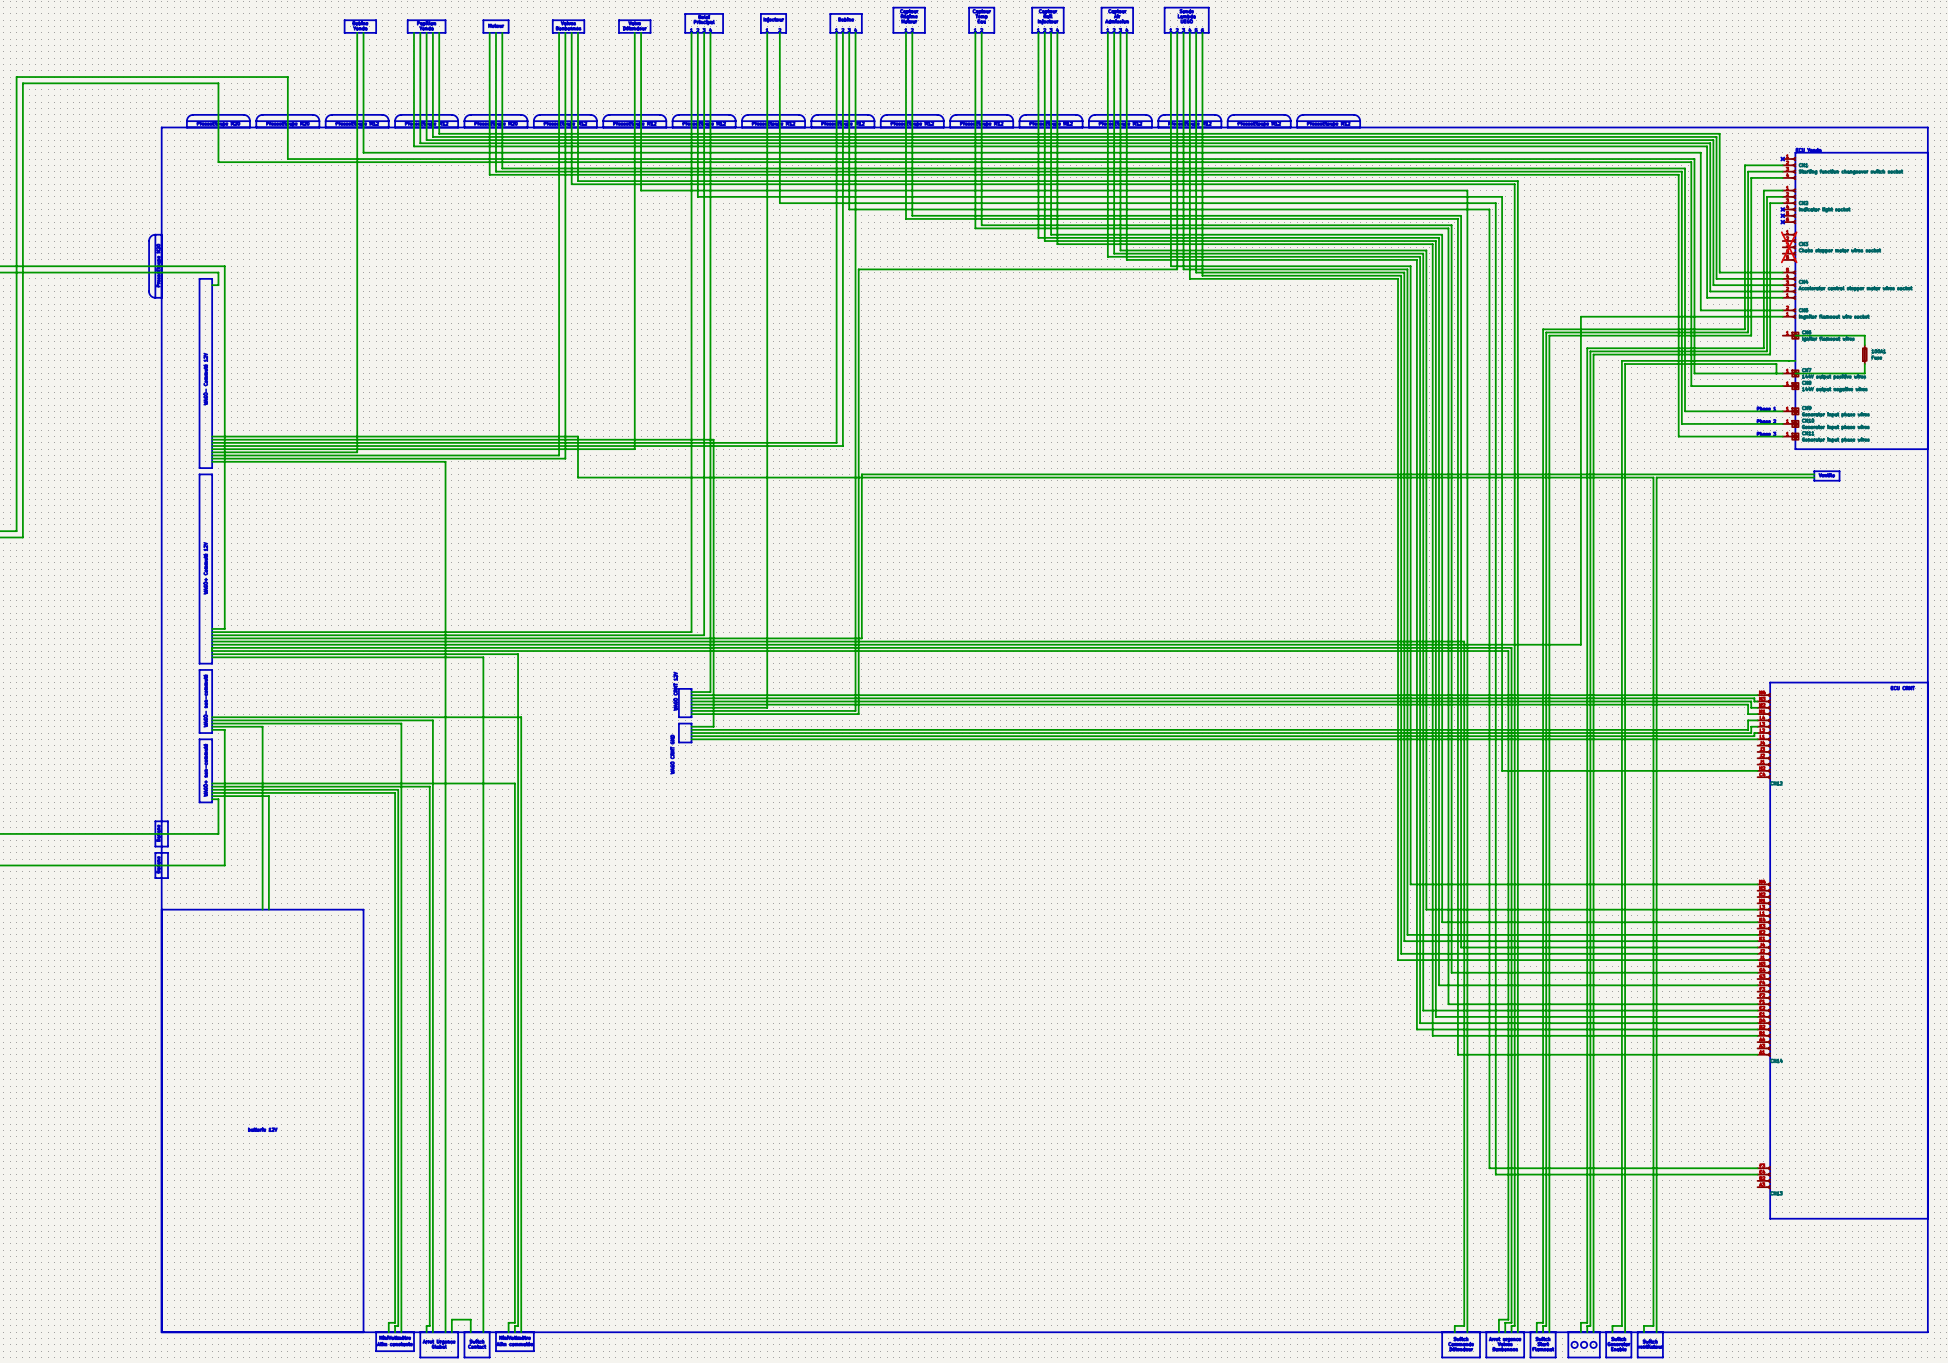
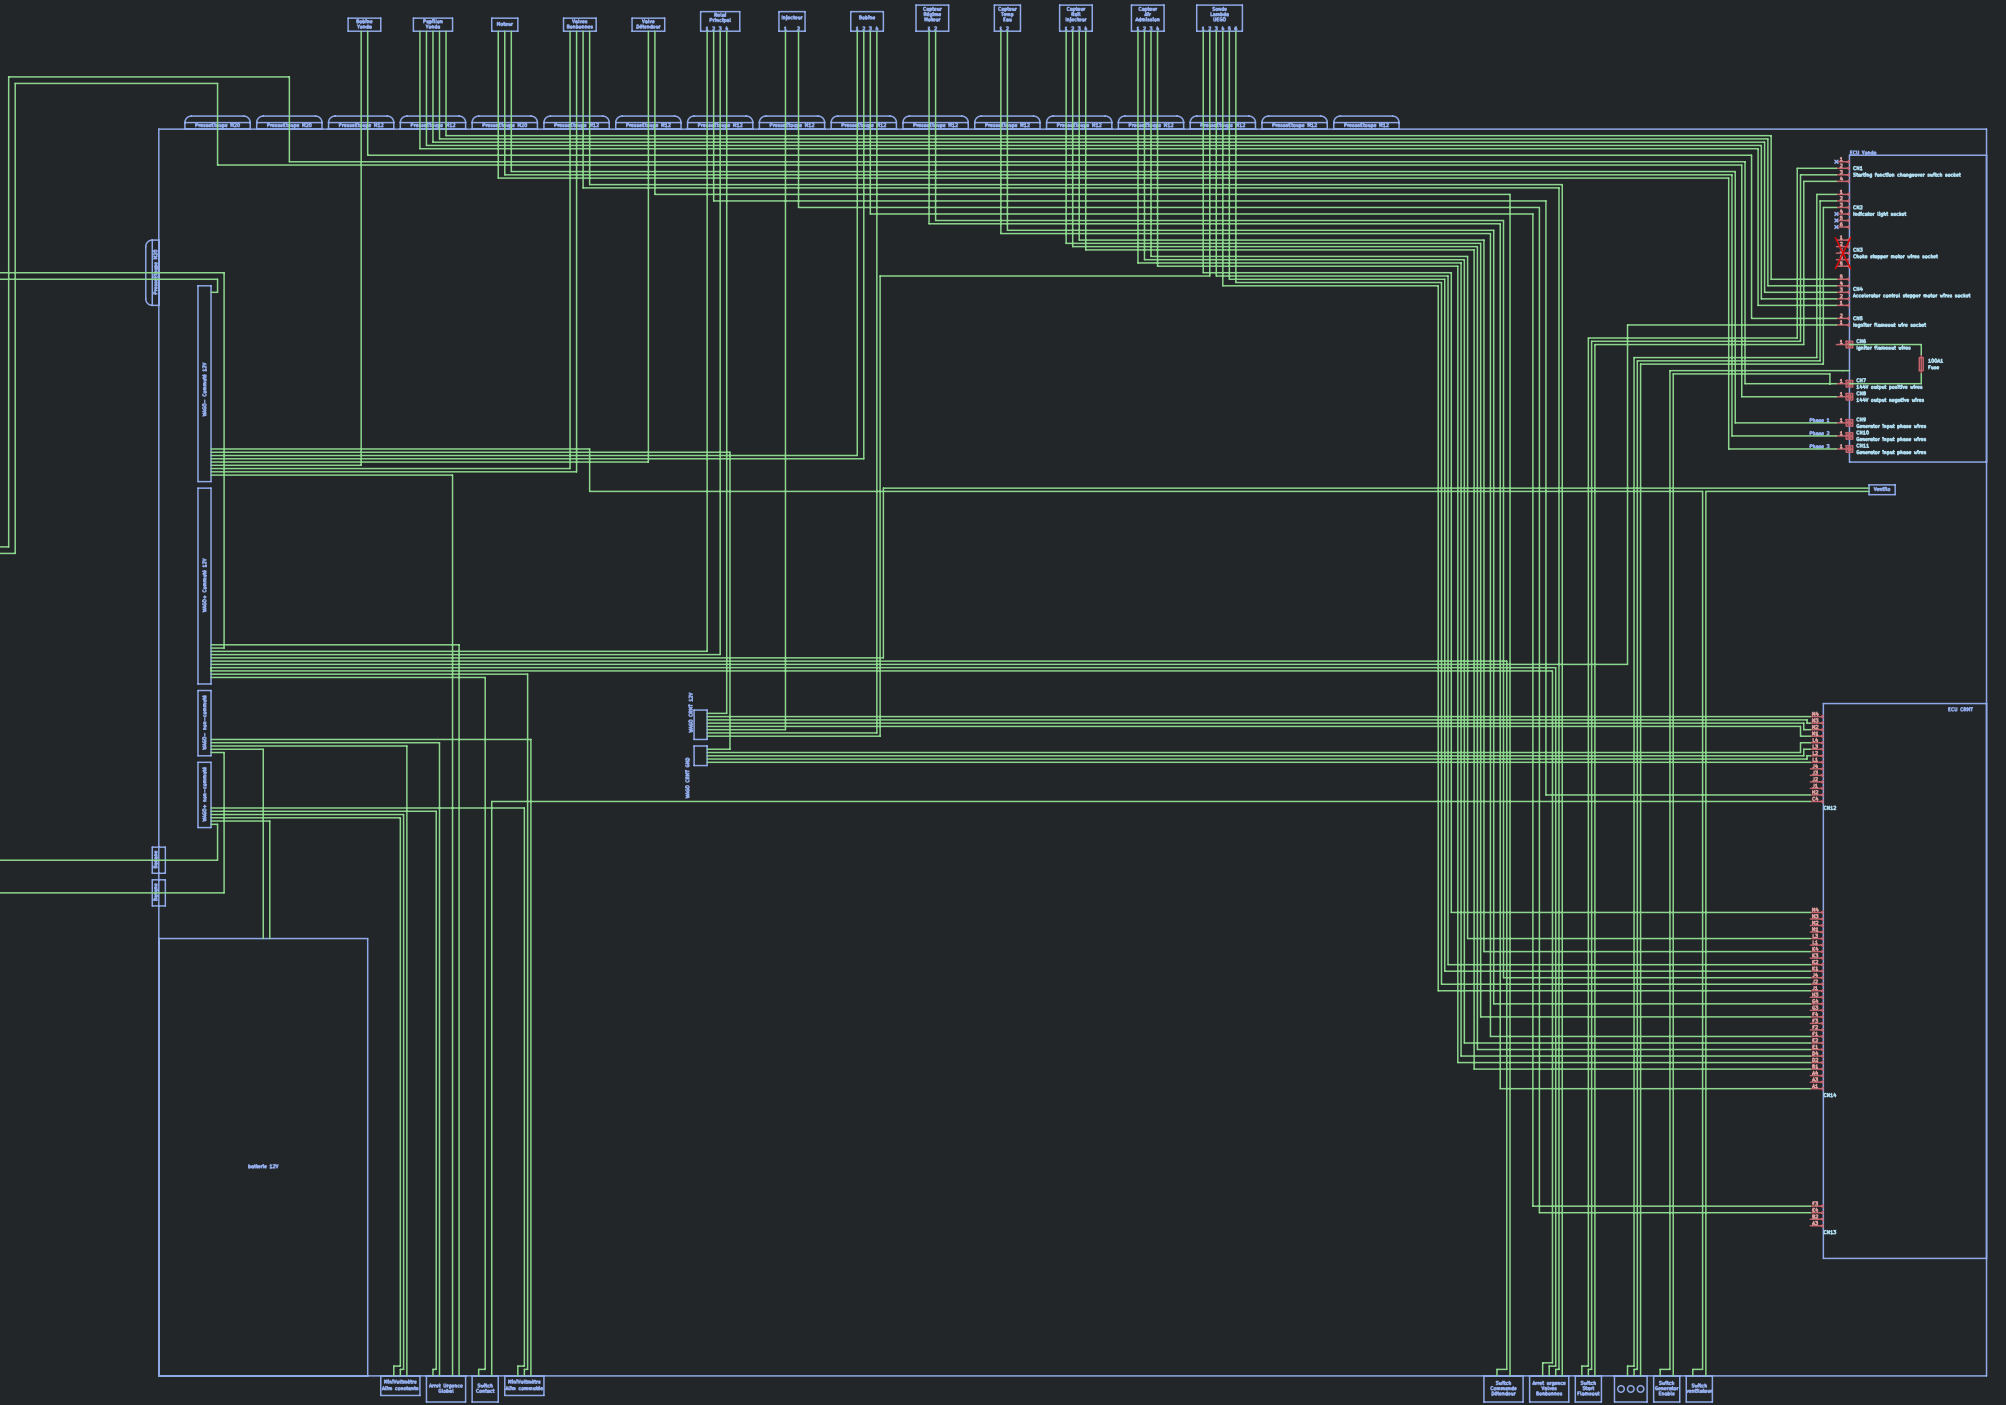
wire: (477, 657) (483, 657) (483, 777) -> (485, 677) (485, 1369) (478, 1369)
wire: none -> (491, 801) (1810, 801)
wire: (451, 1319) (470, 1319) (470, 1325) -> (459, 1362) (459, 644) (211, 644)

